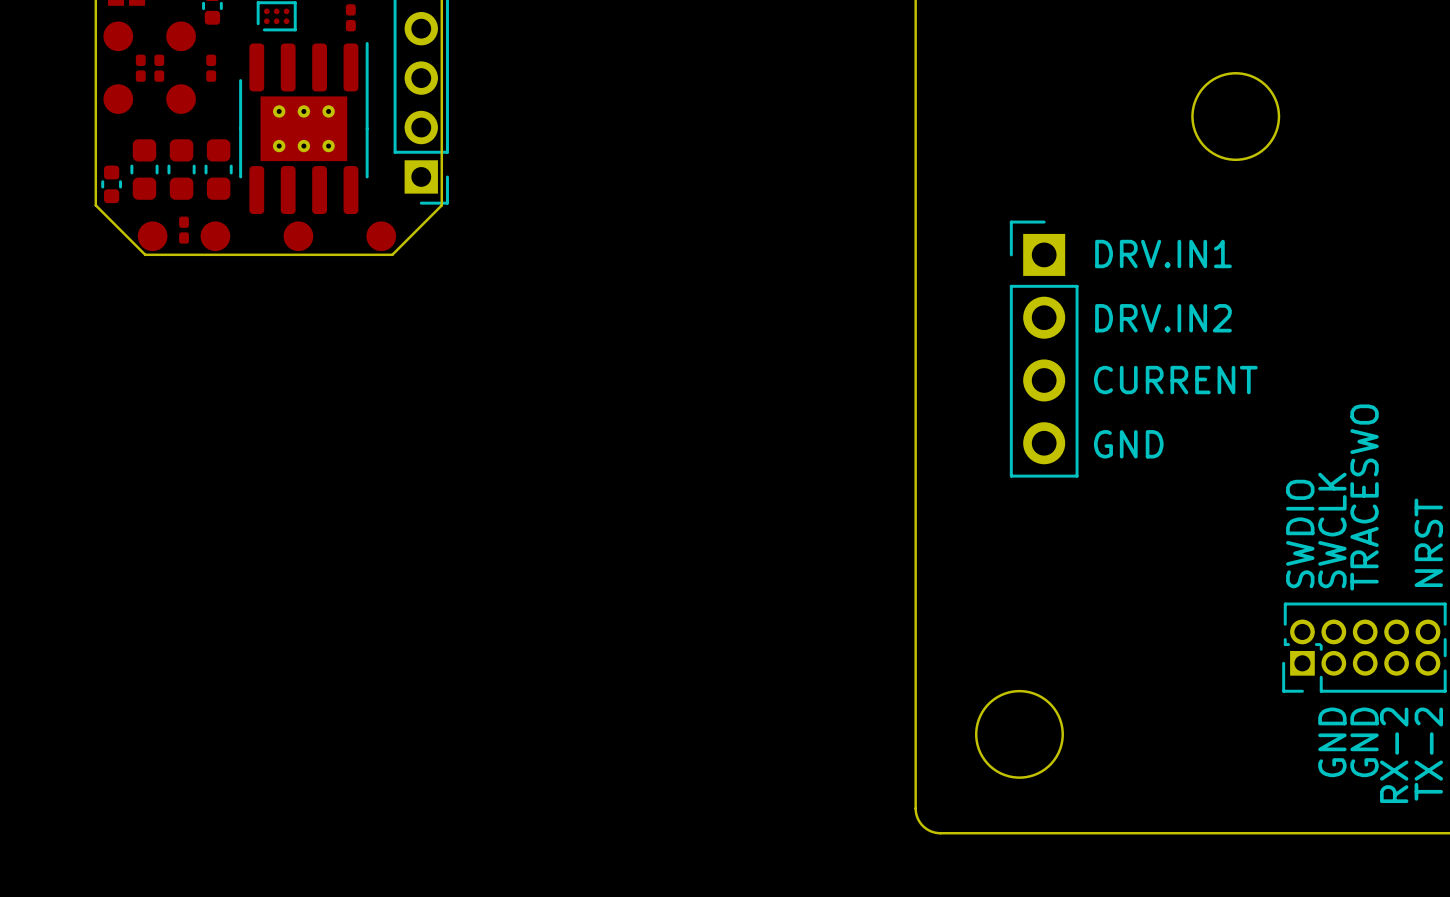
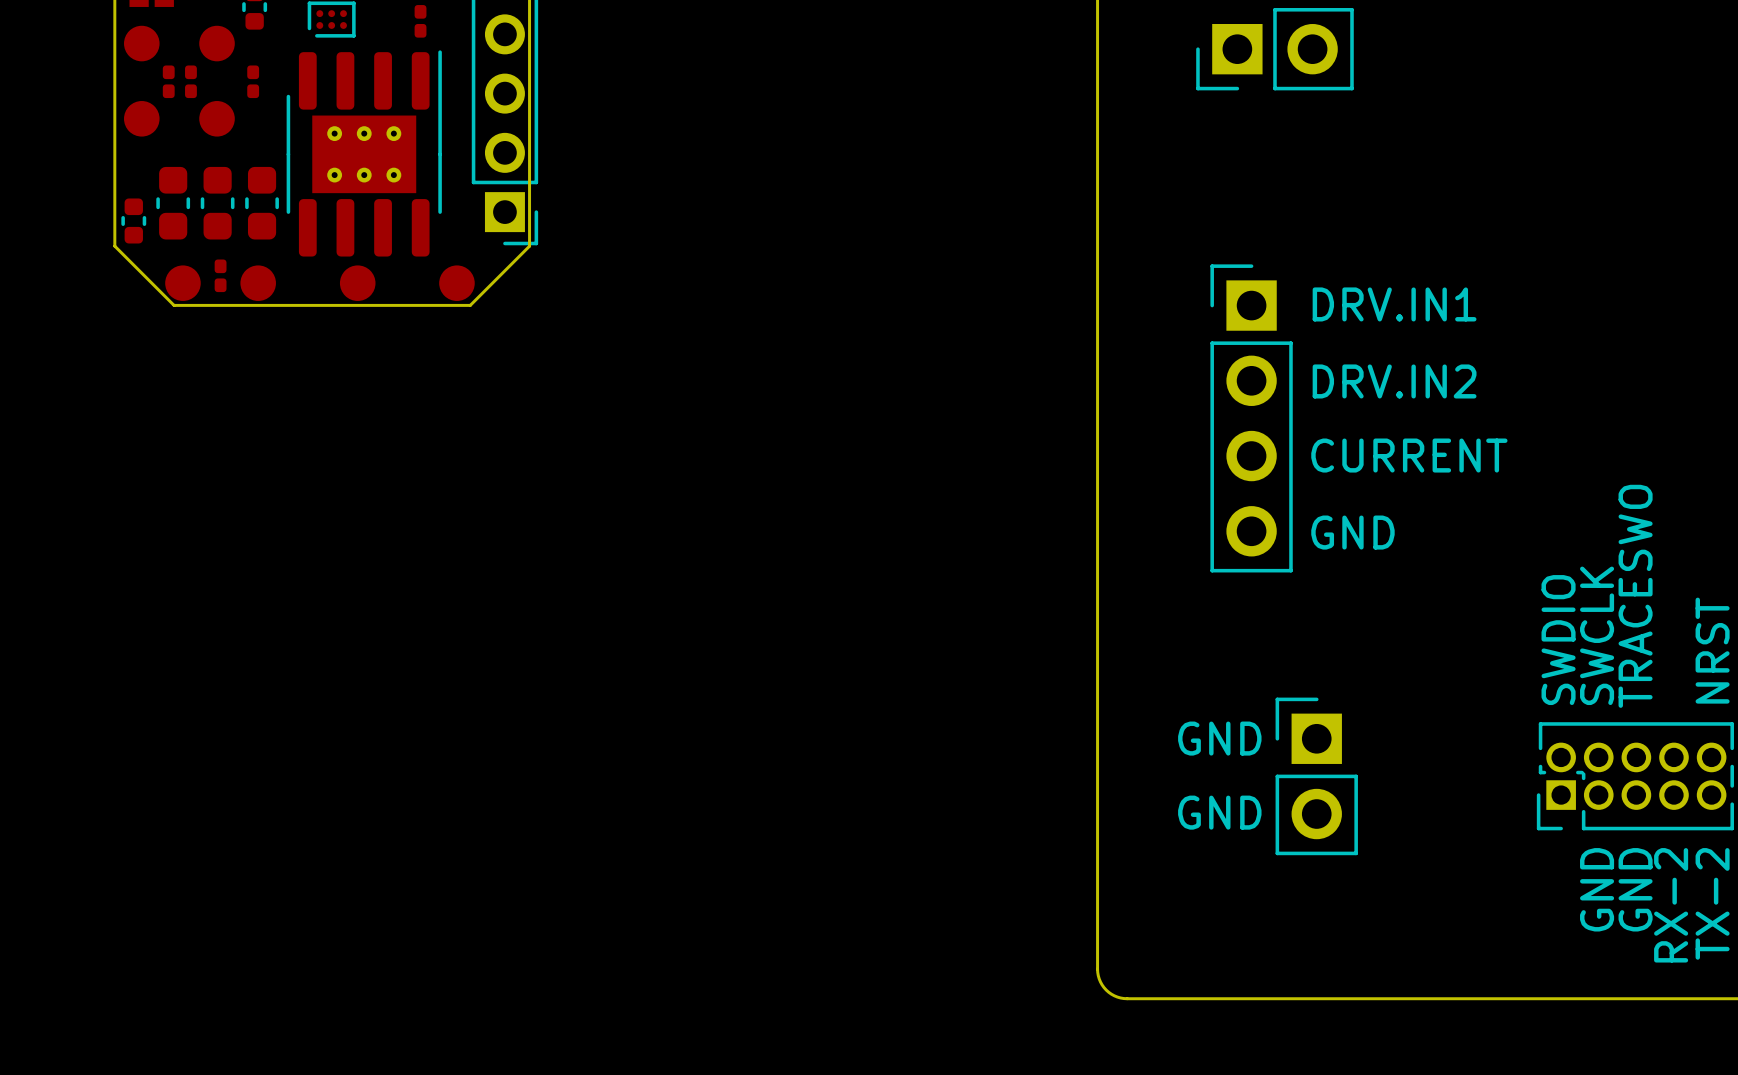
part: none -> (1274, 49)
round board edge: [1191, 72, 1281, 162] -> none
text: none -> GND (1219, 738)
part: none -> (1316, 776)
text: none -> GND (1219, 812)
round board edge: [974, 689, 1064, 779] -> none

